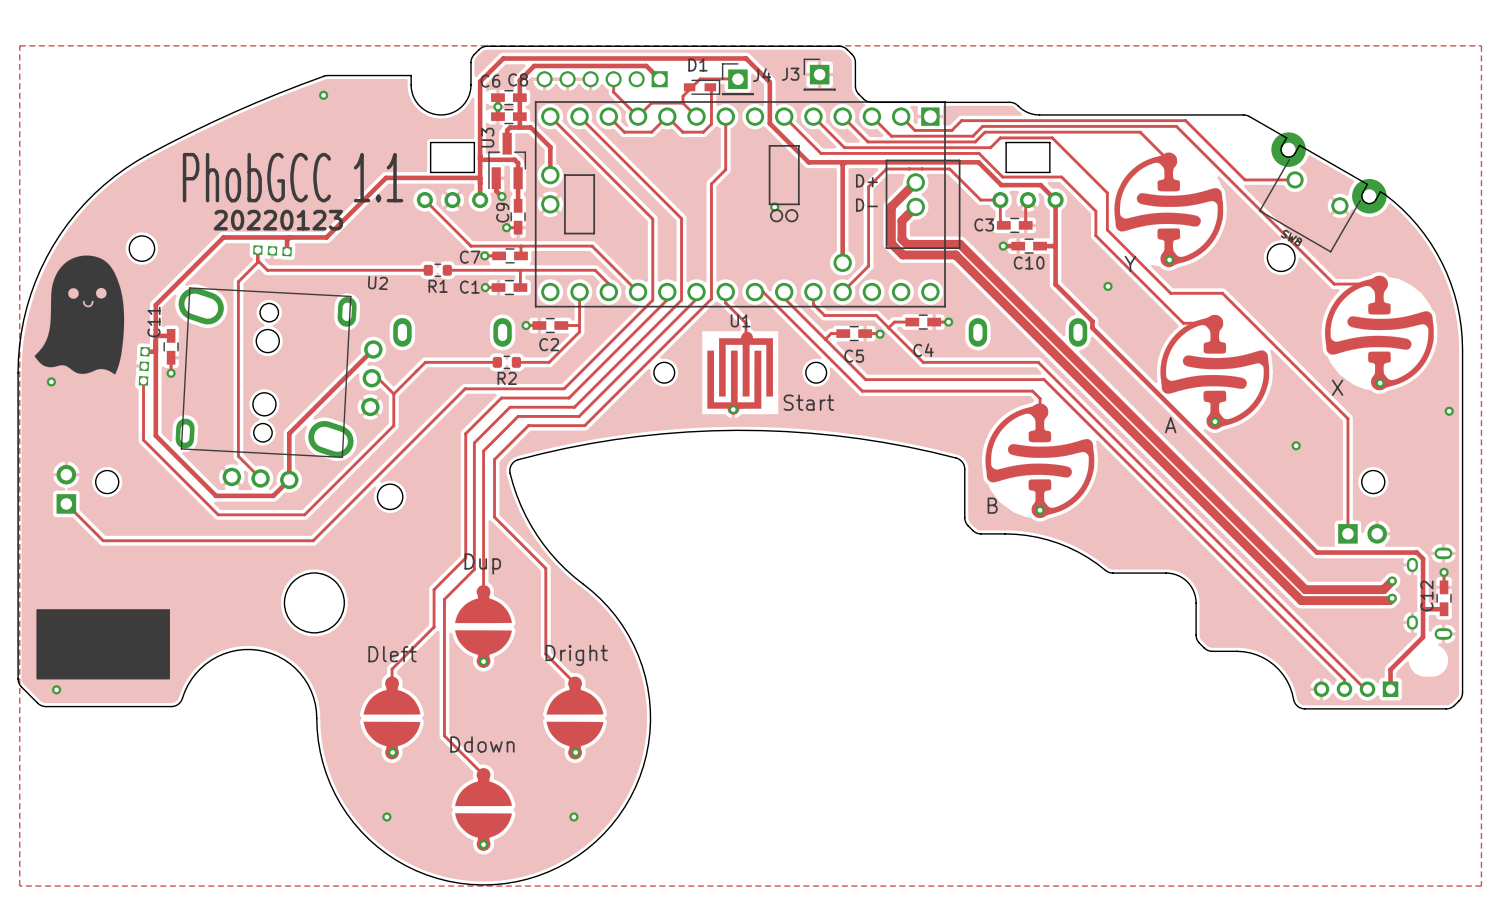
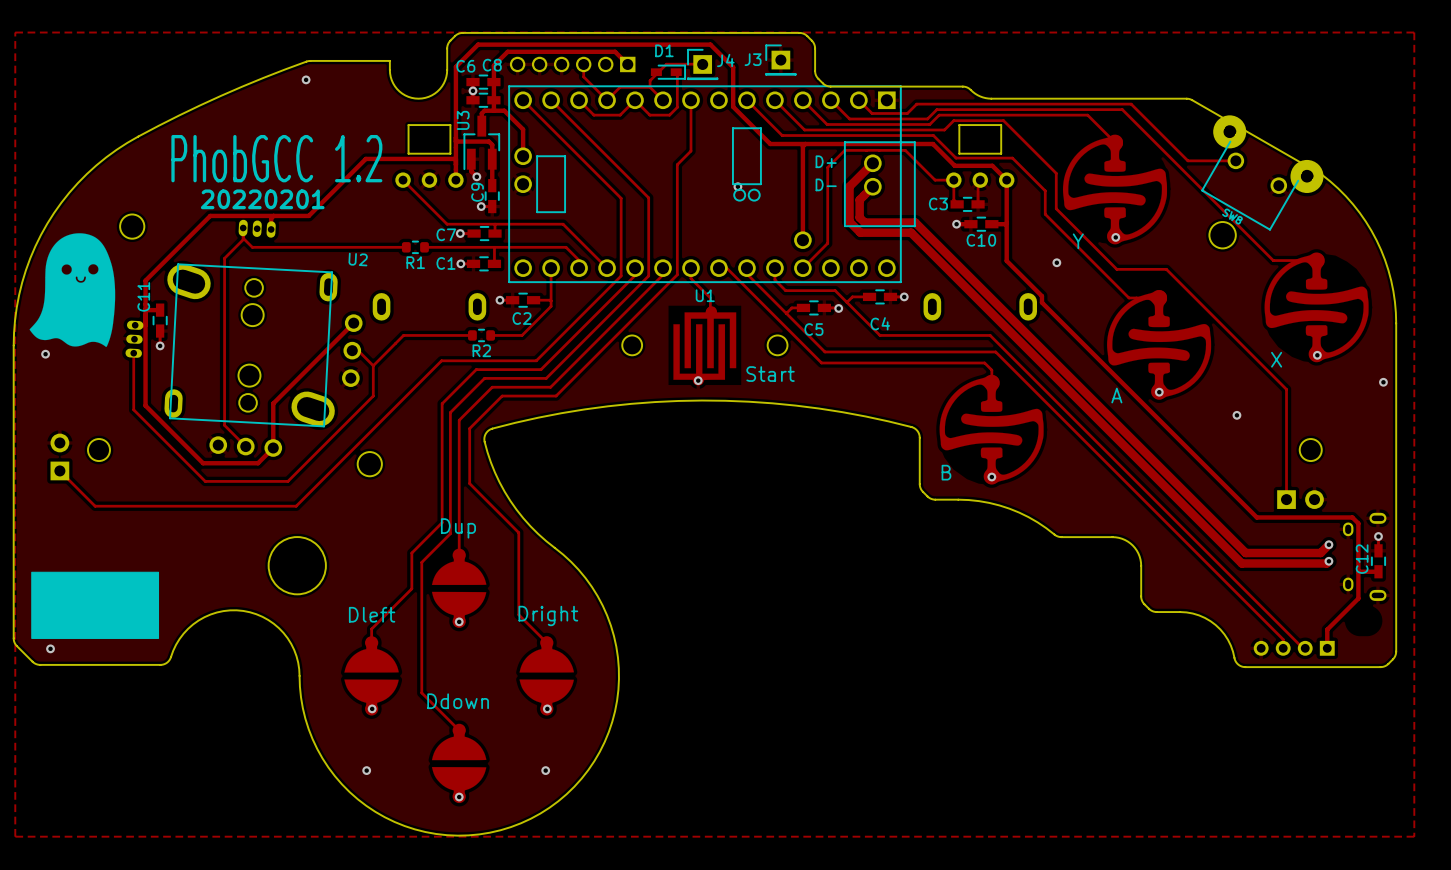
text: PhobGCC 1.1 (293, 177) -> PhobGCC 1.2 (276, 158)
text: 20220123 (278, 220) -> 20220201 (262, 199)
U2 footprint: [138, 245, 383, 490] -> [125, 219, 363, 457]

